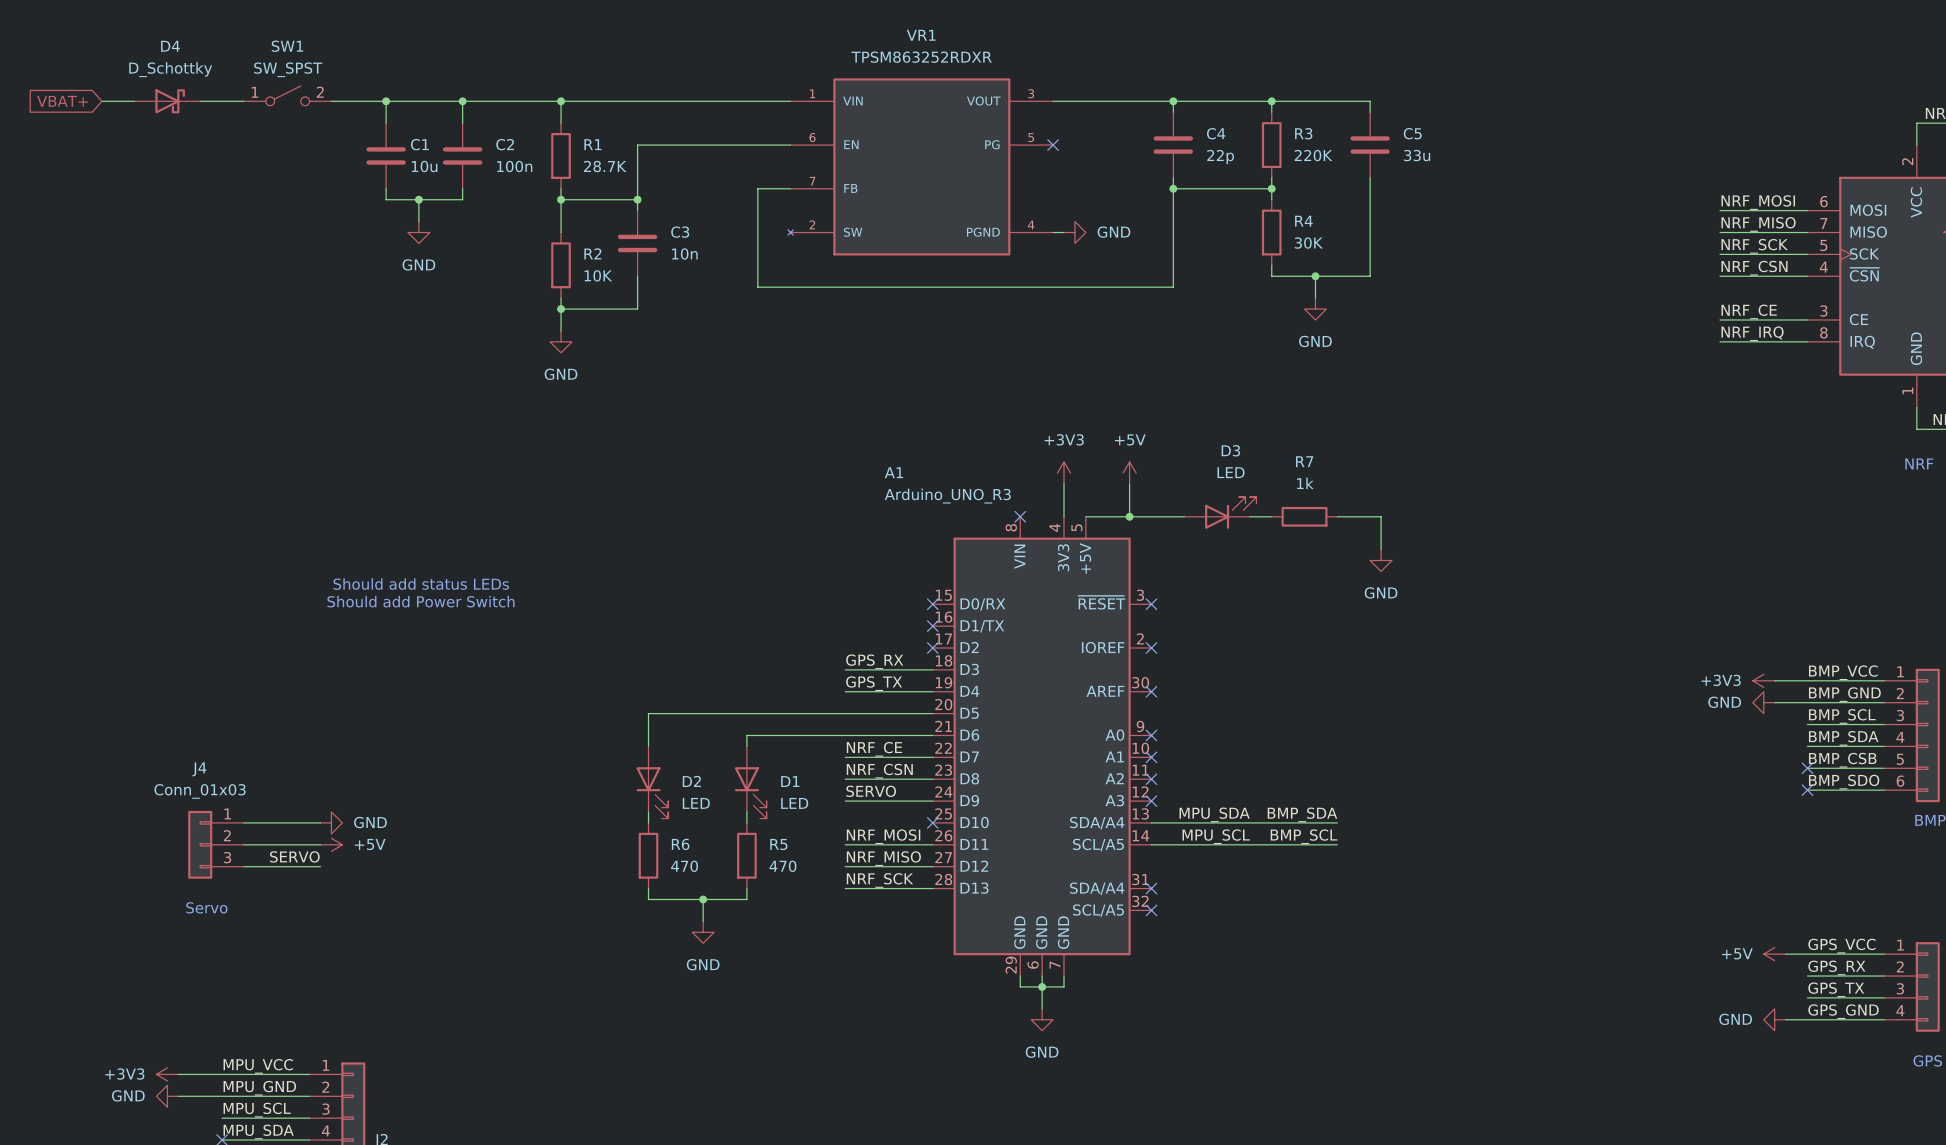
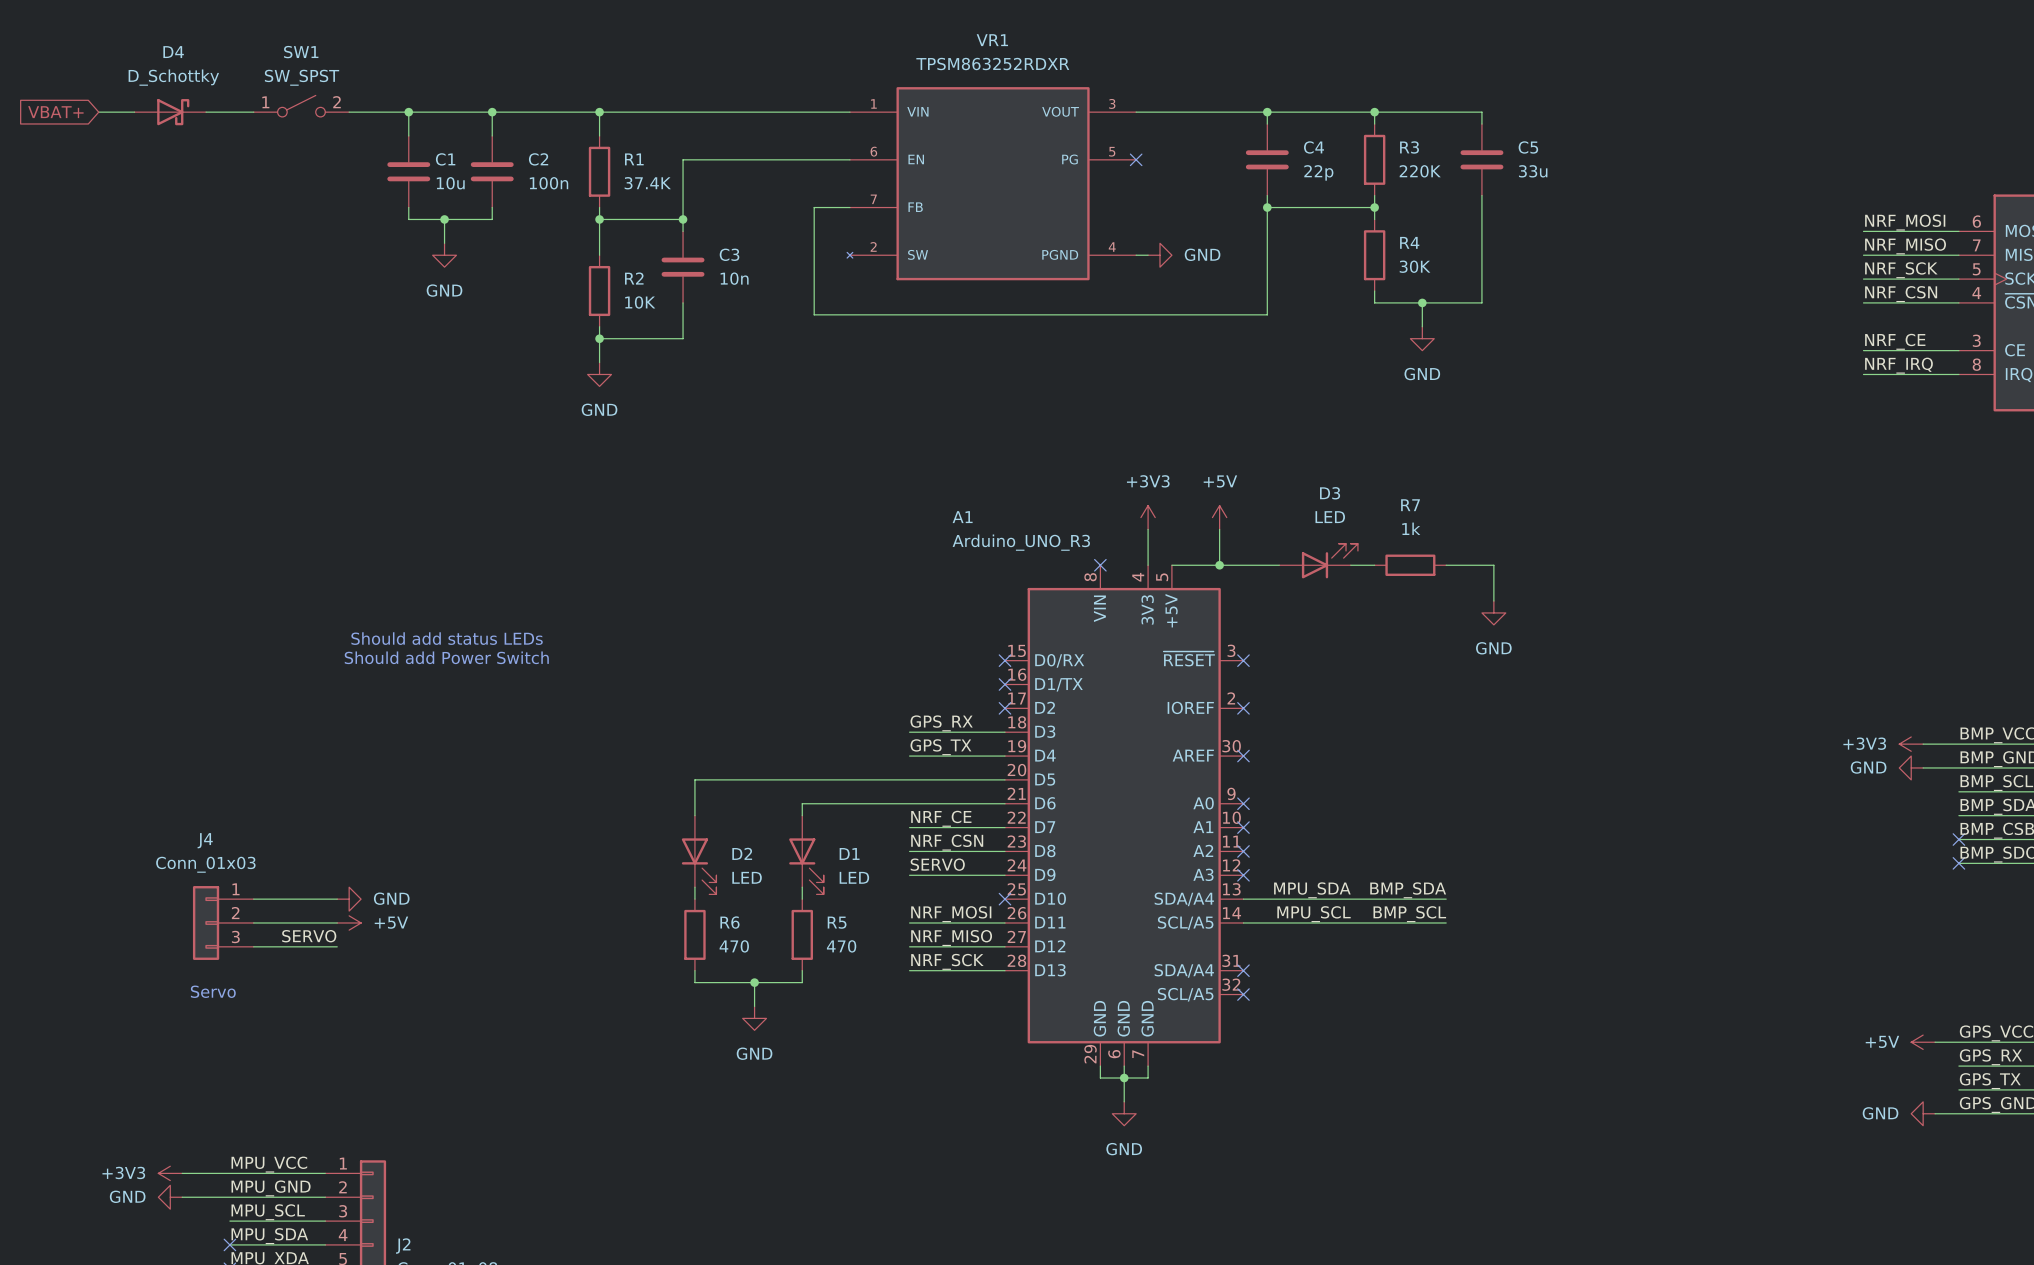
R1 value: 28.7K (605, 166) -> 37.4K (647, 183)

